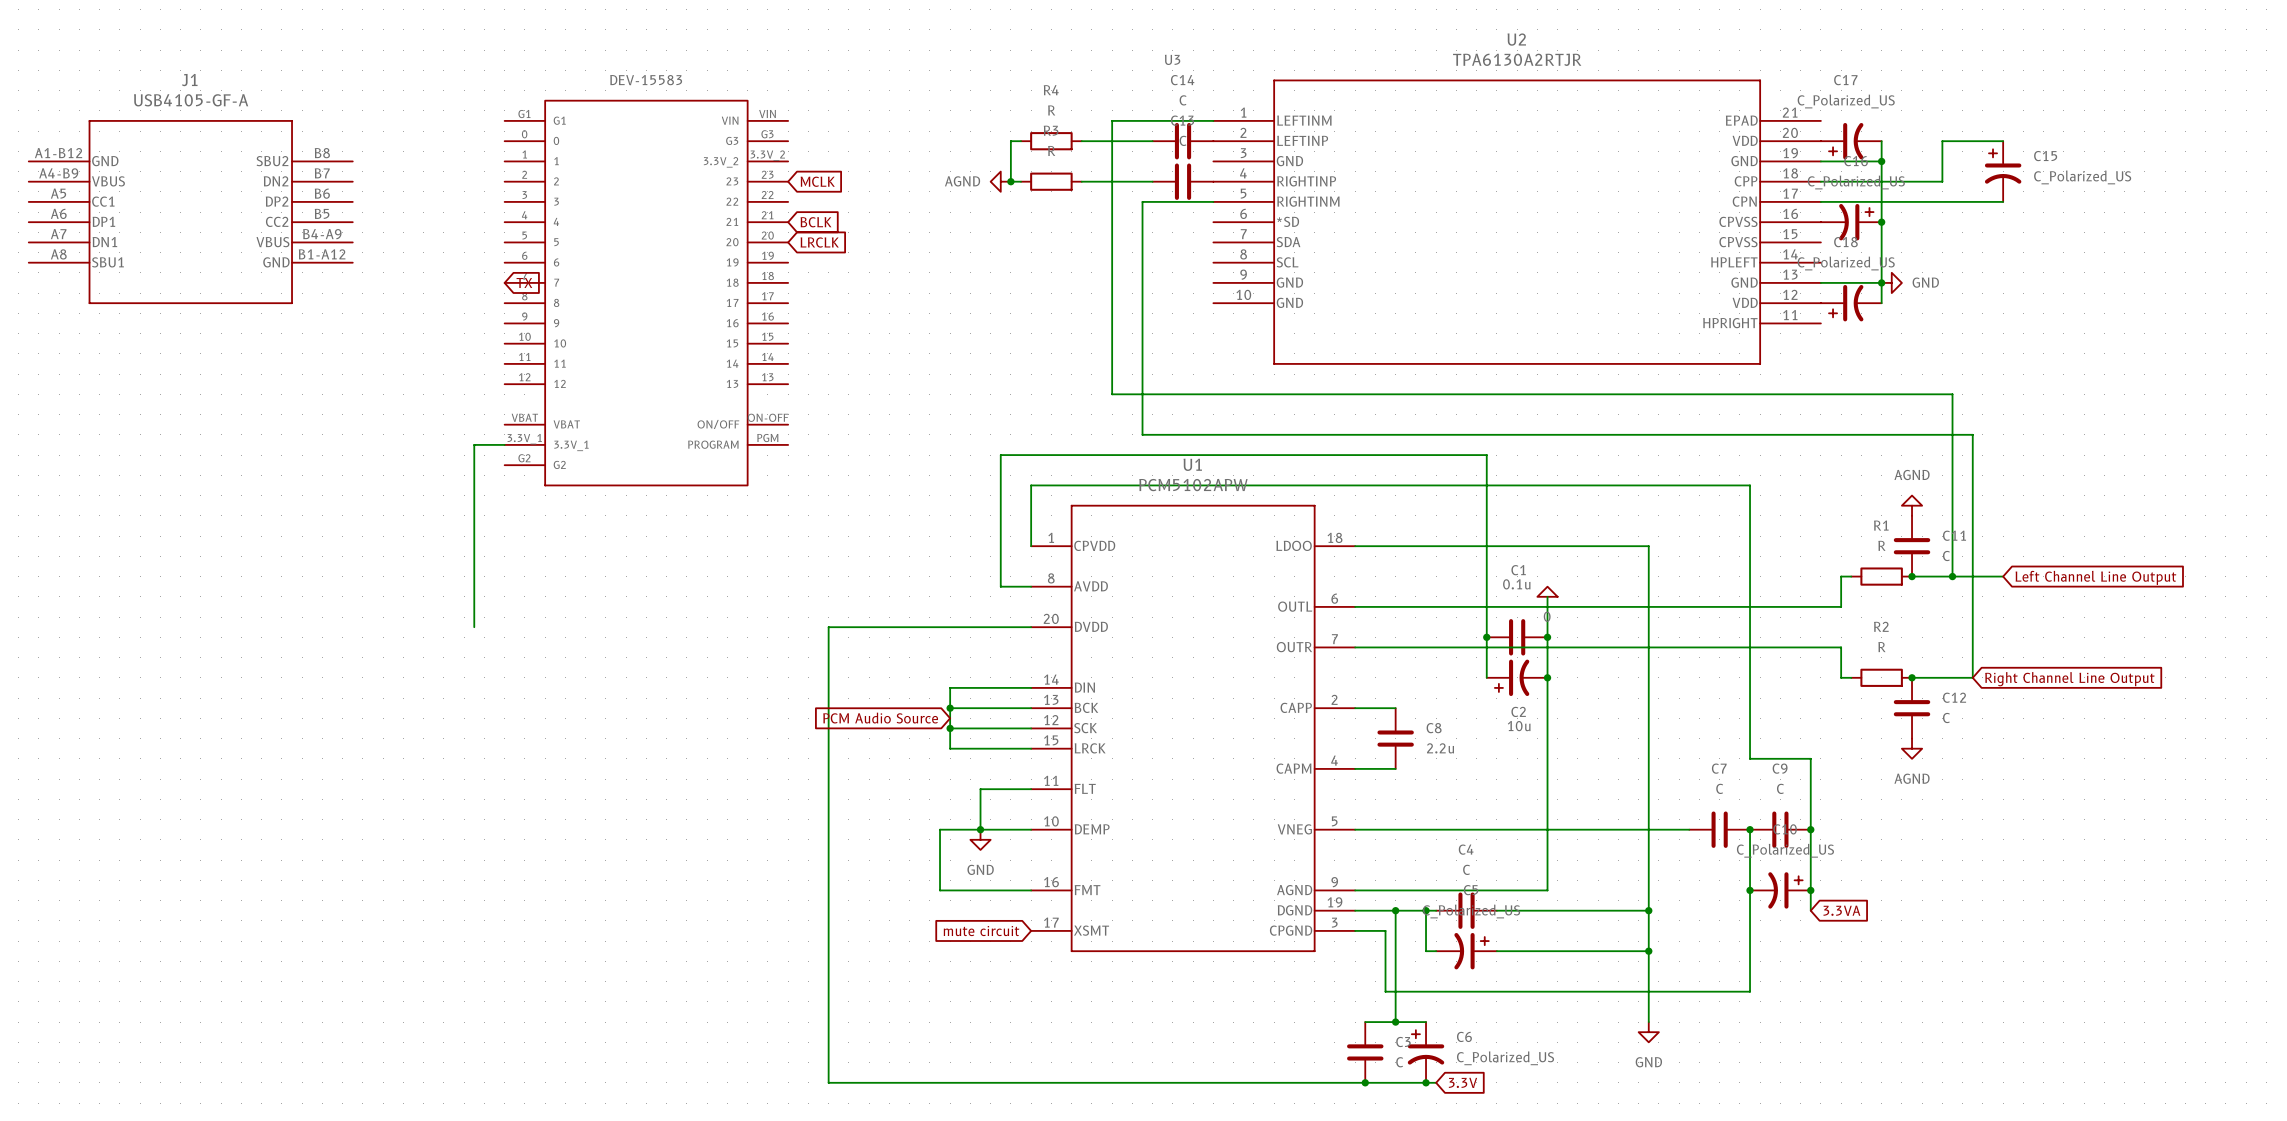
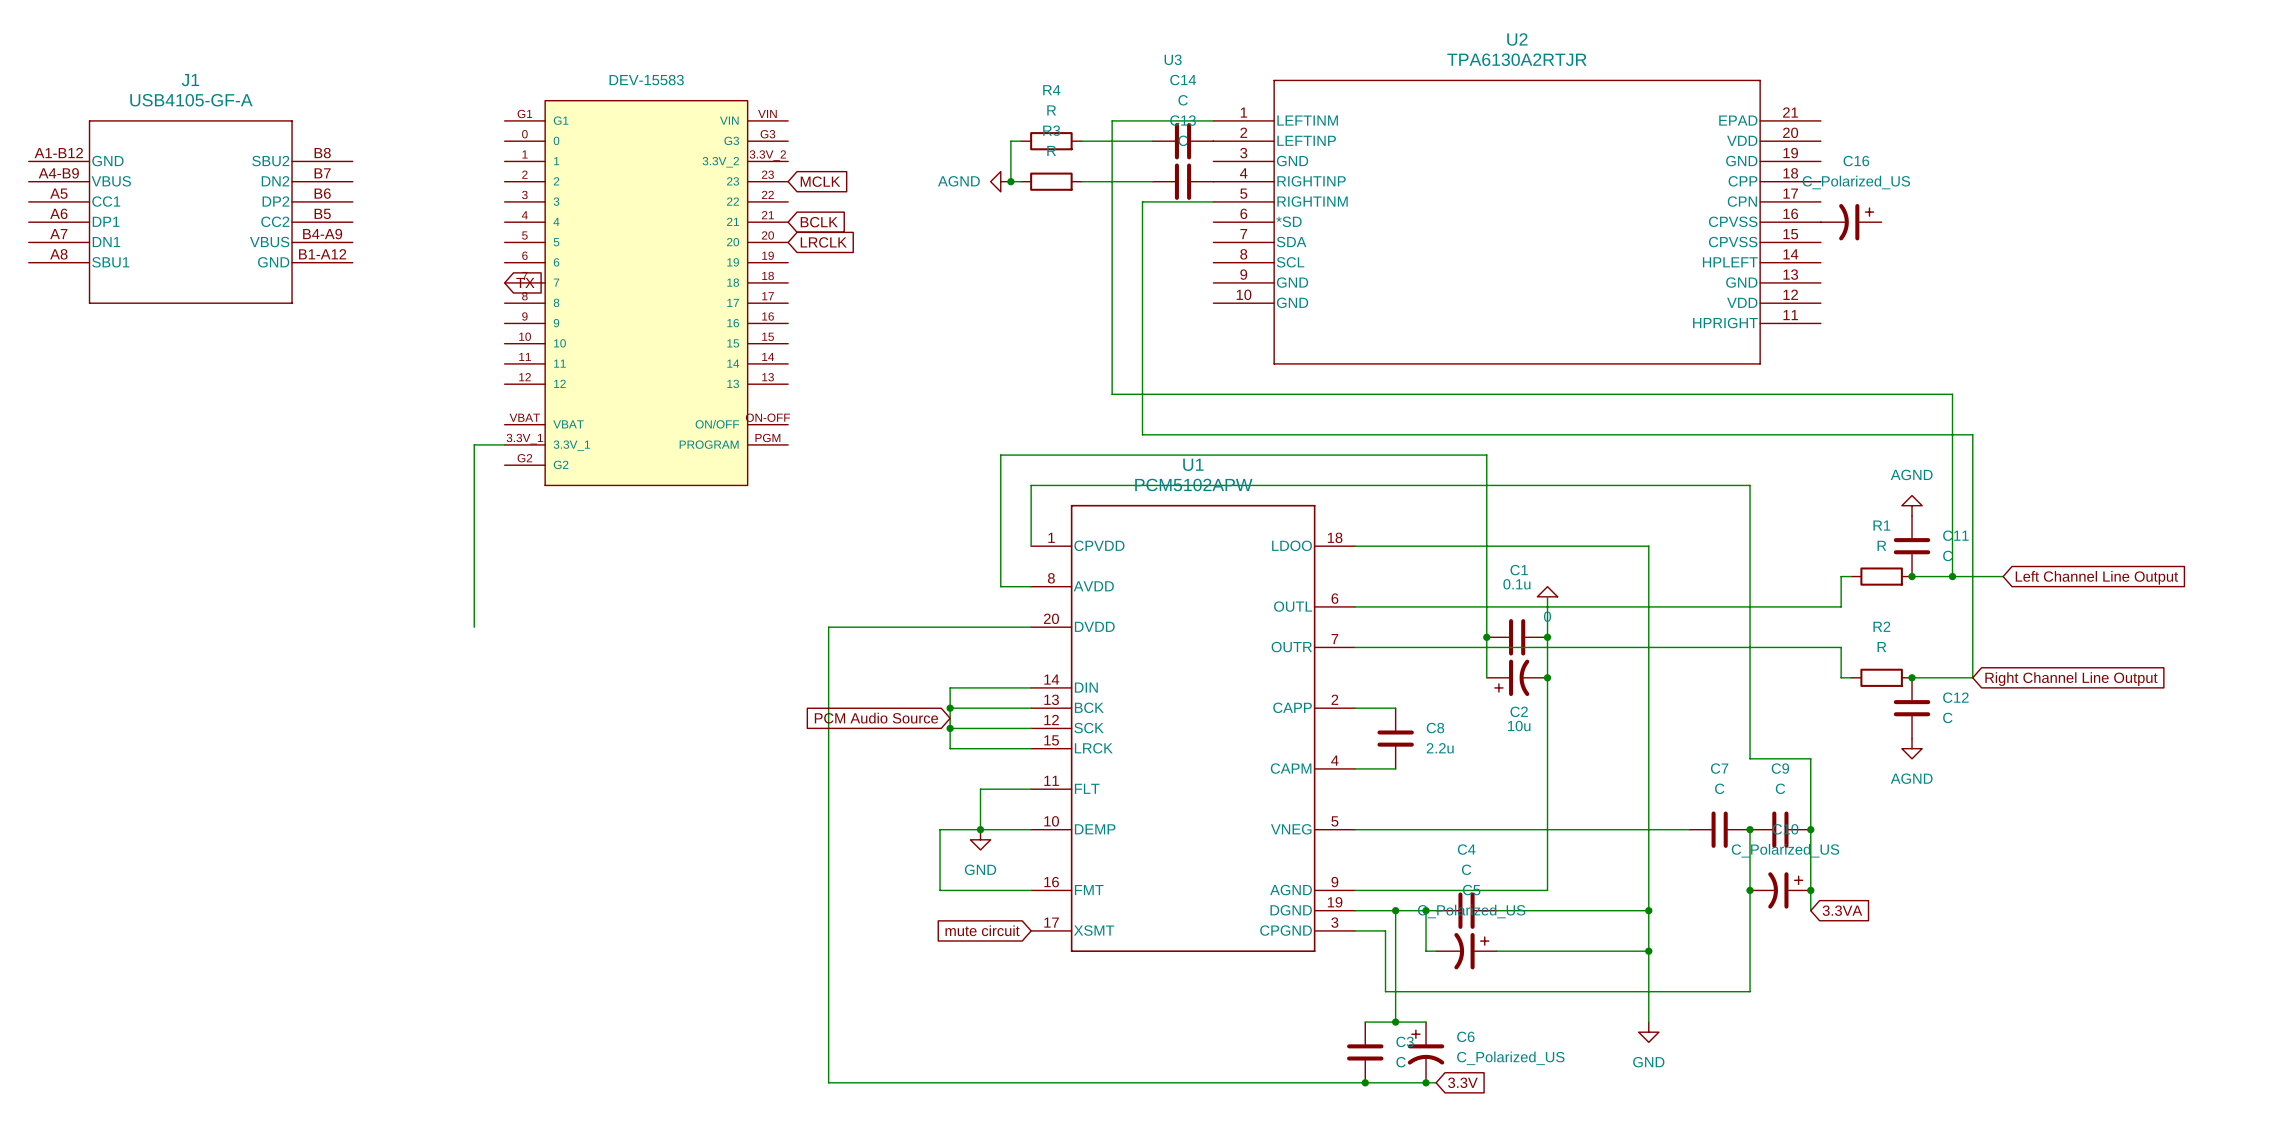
C17: C_Polarized_US (1851, 141) -> none
wire: (1881, 141) (1881, 303) -> none
wire: (2003, 141) (1942, 141) (1942, 181) (1820, 181) -> none
wire: (1820, 161) (1881, 161) -> none
junction: (1881, 161) -> none
C15: C_Polarized_US (2003, 171) -> none
wire: (1820, 201) (2003, 201) -> none
junction: (1881, 222) -> none
wire: (1820, 282) (1881, 282) -> none
junction: (1881, 282) -> none
power symbol: GND (1891, 282) -> none
C18: C_Polarized_US (1851, 303) -> none

